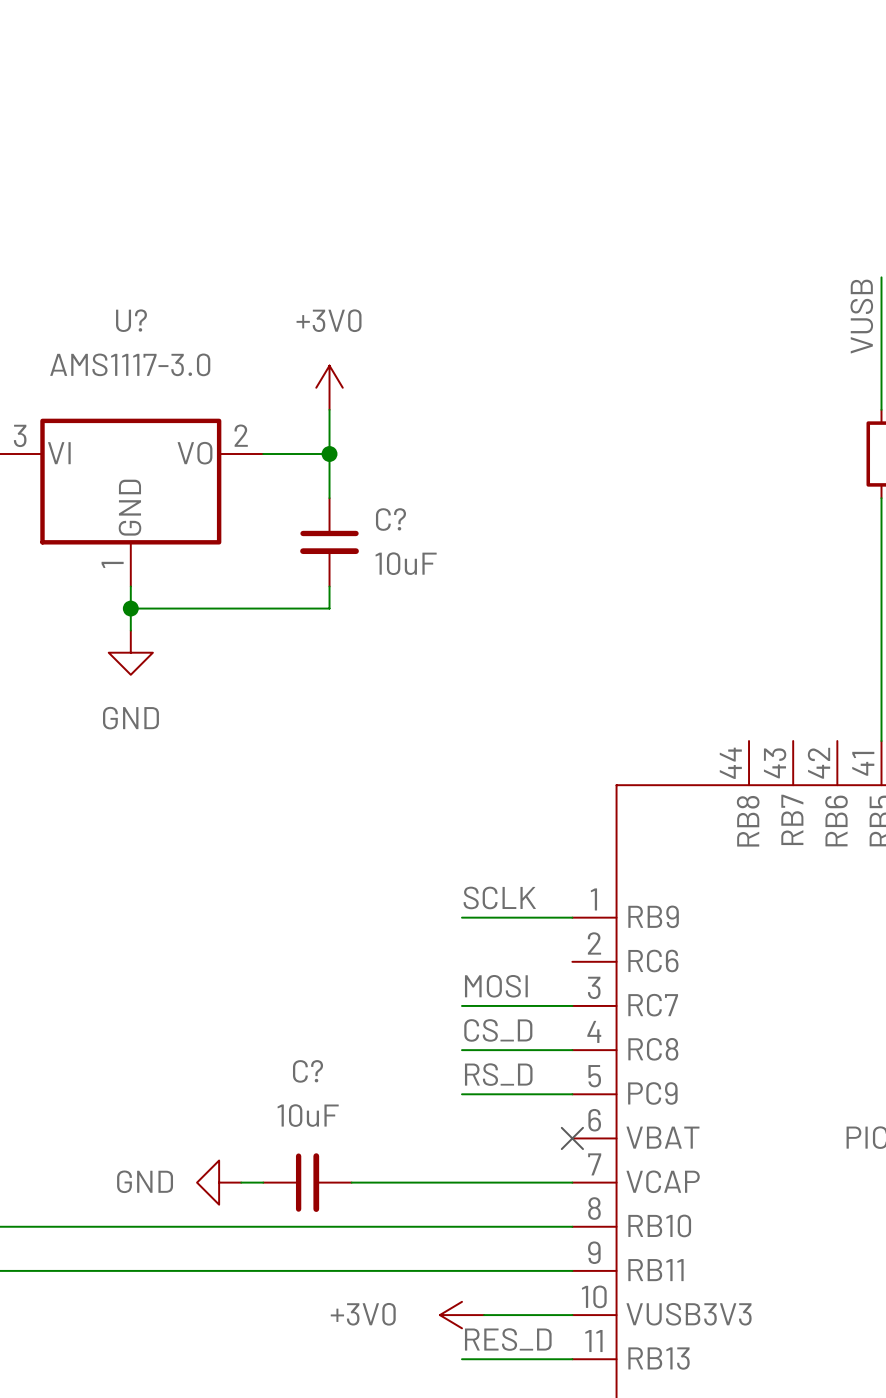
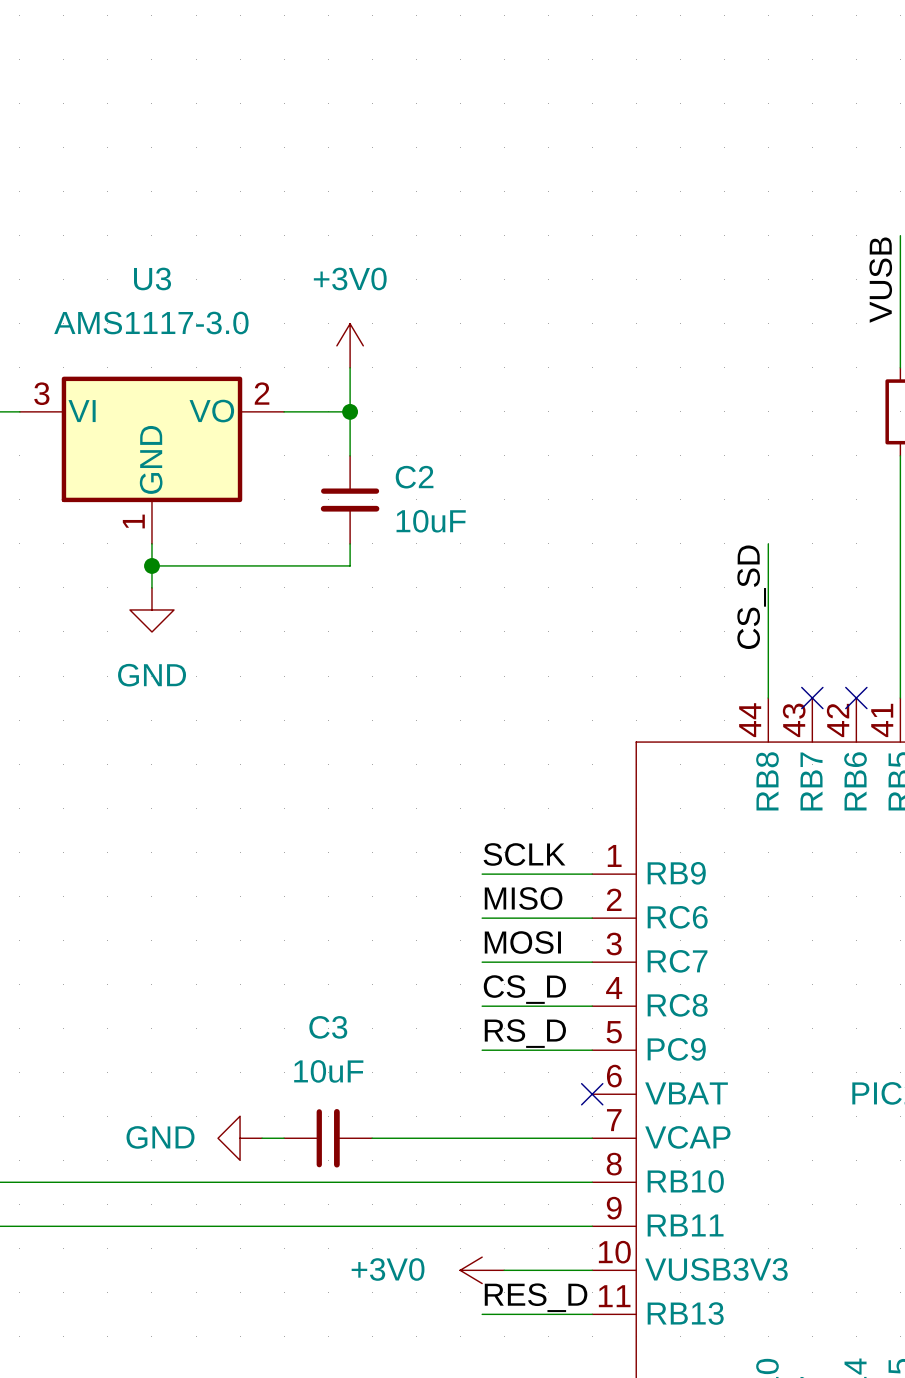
U? name: U? (131, 320) -> U3 (152, 278)
C? name: C? (390, 519) -> C2 (414, 477)
wire: none -> (768, 543) (768, 698)
label: none -> CS_SD (751, 597)
no-connect mark: none -> (812, 698)
no-connect mark: none -> (856, 698)
label: none -> MISO (523, 898)
wire: none -> (482, 918) (592, 918)
C? name: C? (308, 1071) -> C3 (328, 1027)

